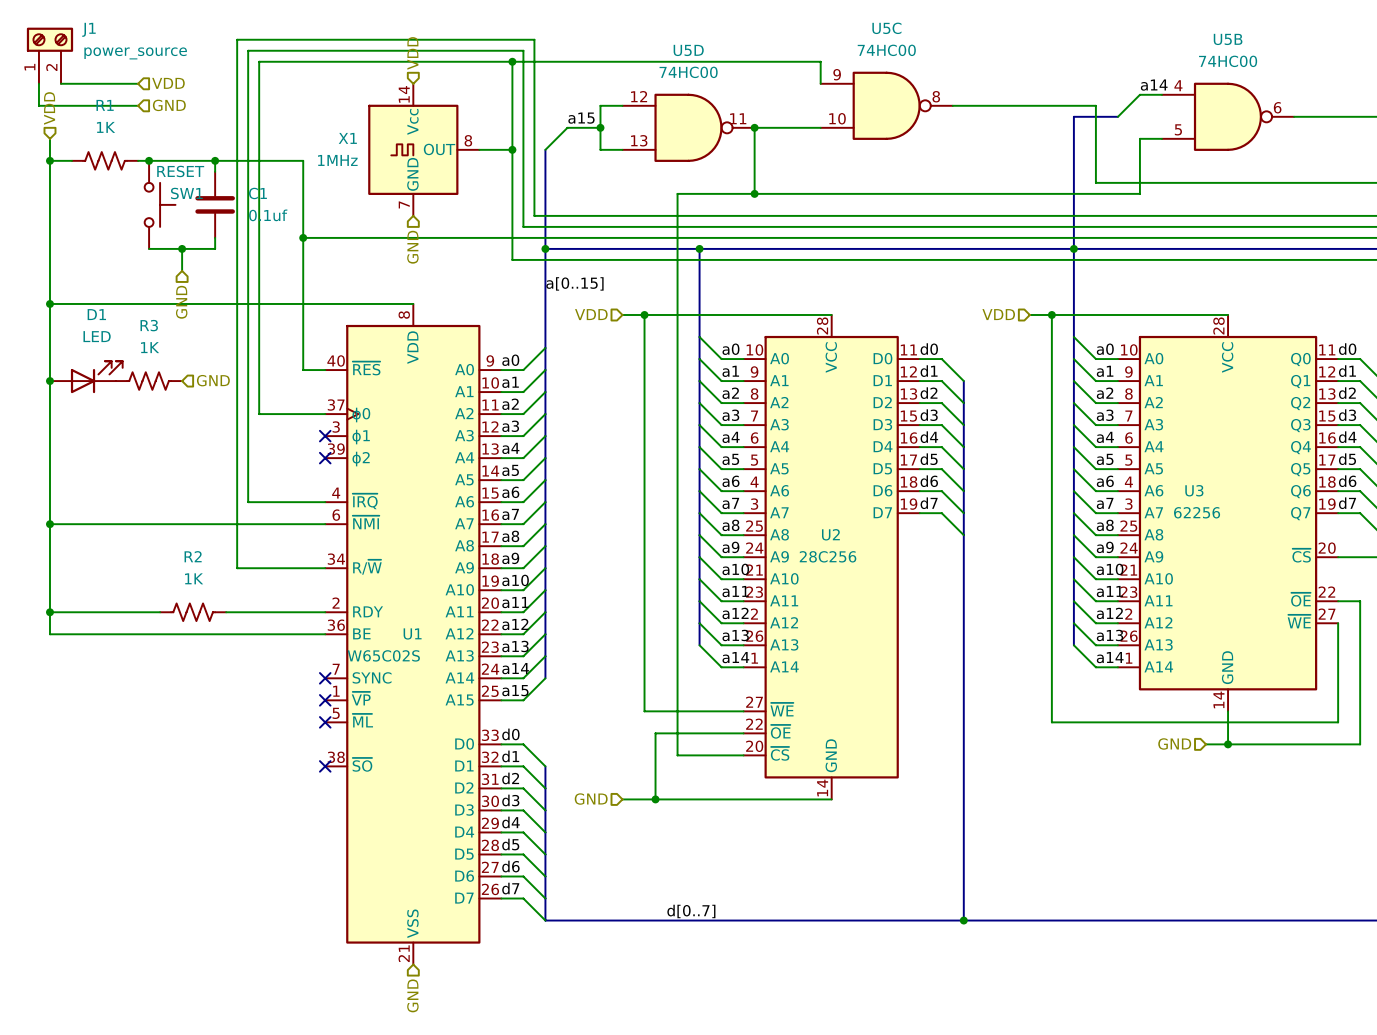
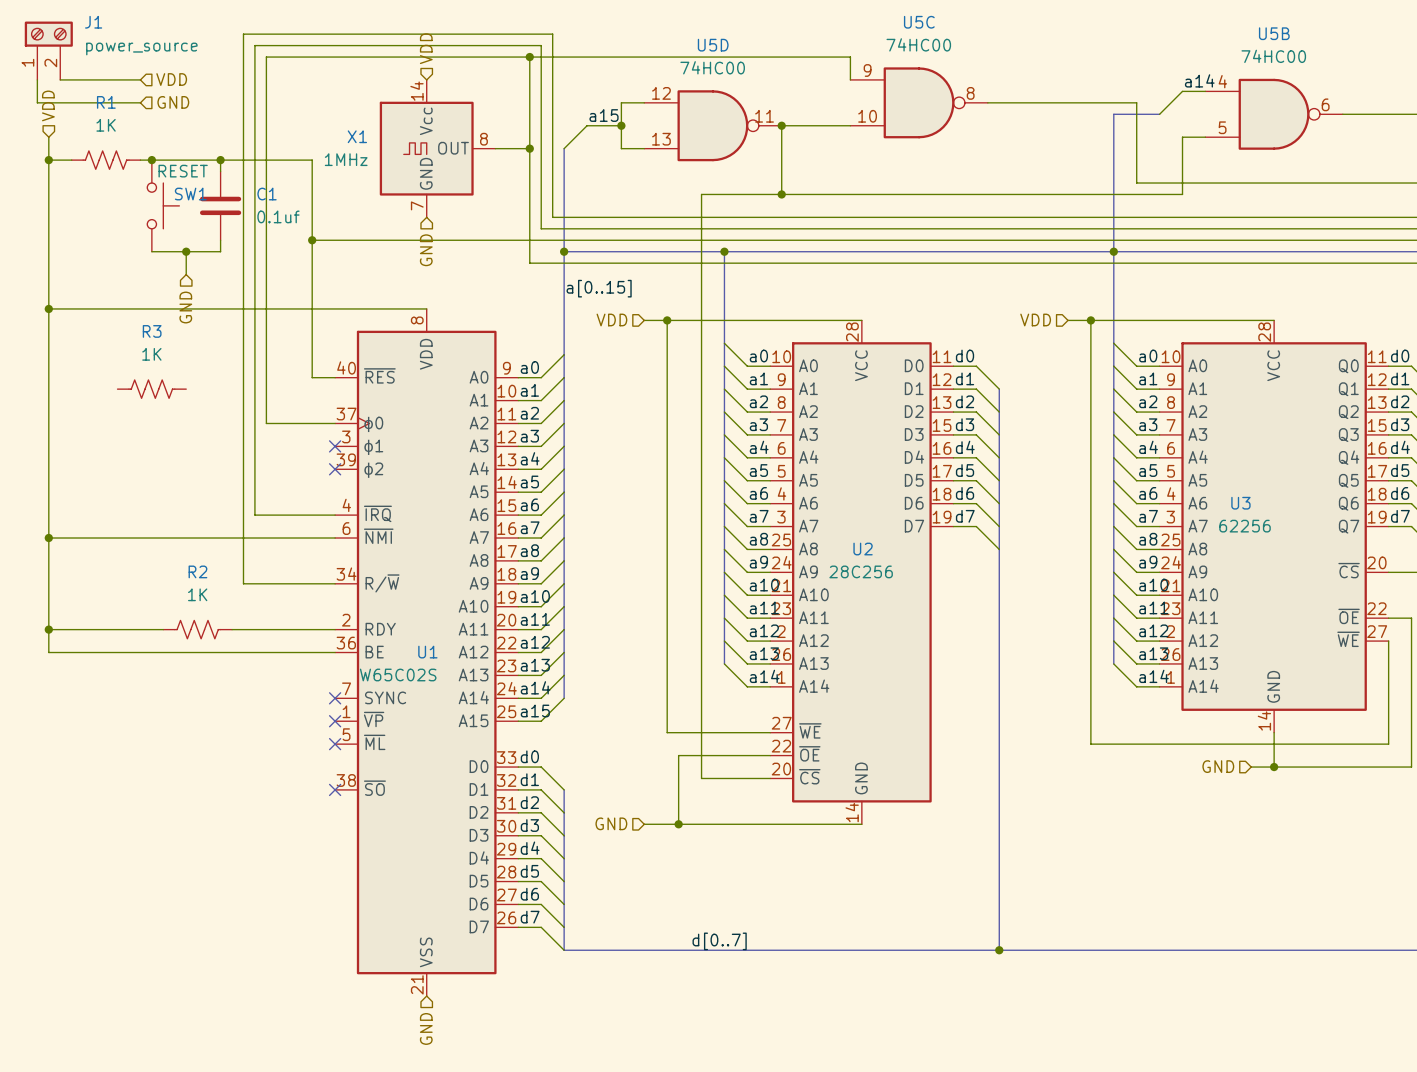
D1: LED (86, 377) -> none
hierarchical label: GND (213, 380) -> none
junction: (49, 381) -> none

